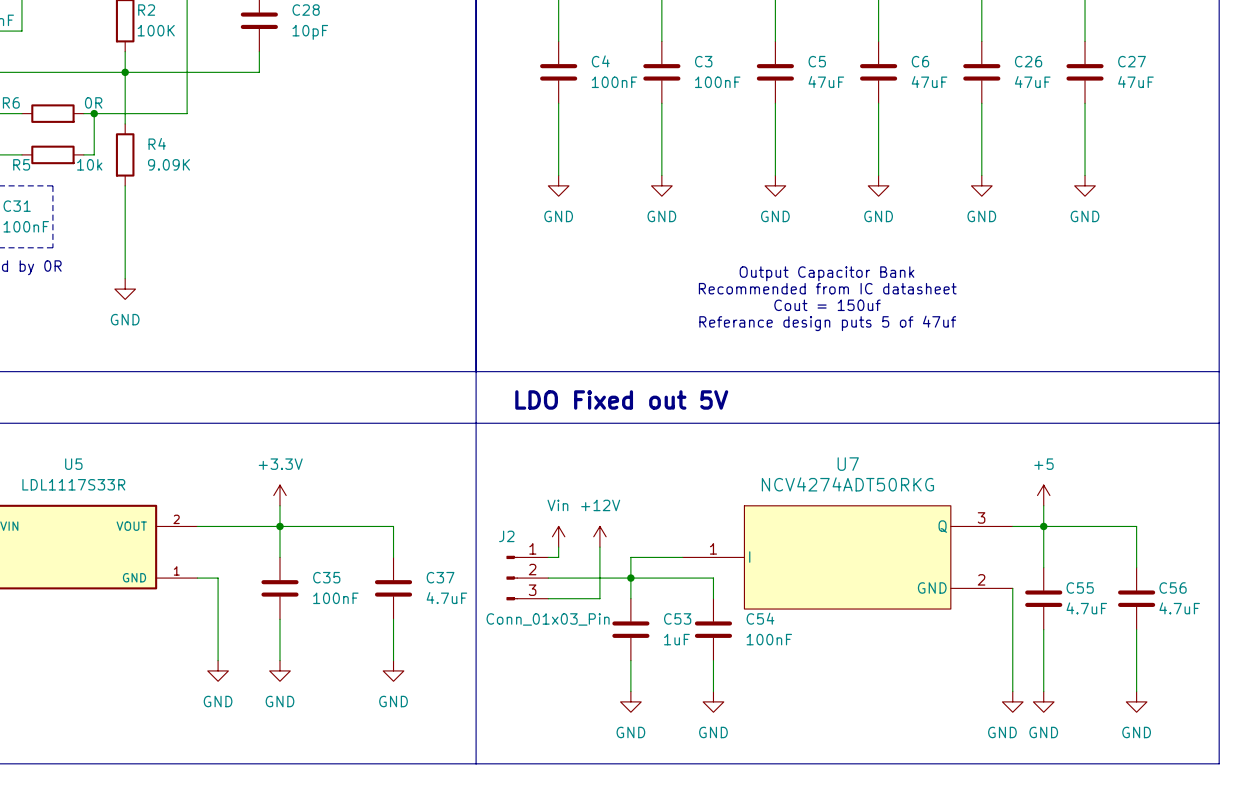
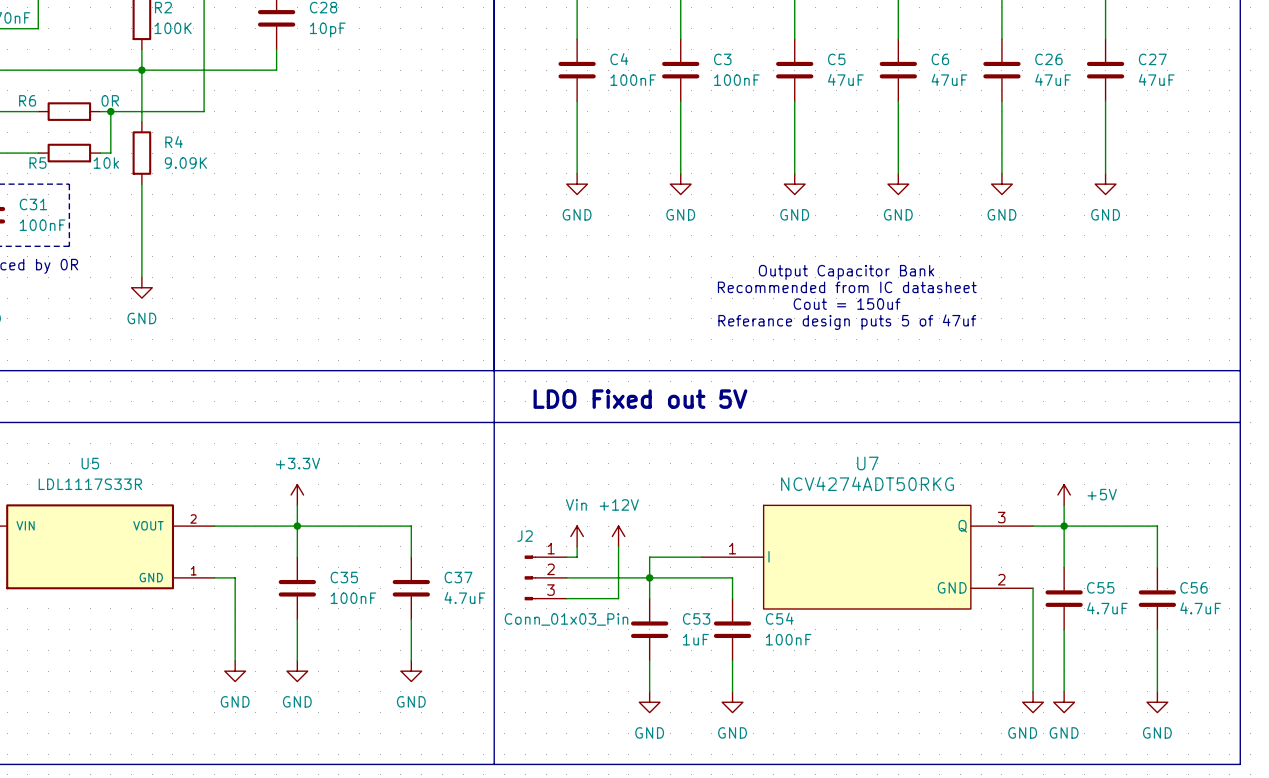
power symbol: +5 (1043, 495) -> +5V (1064, 495)

